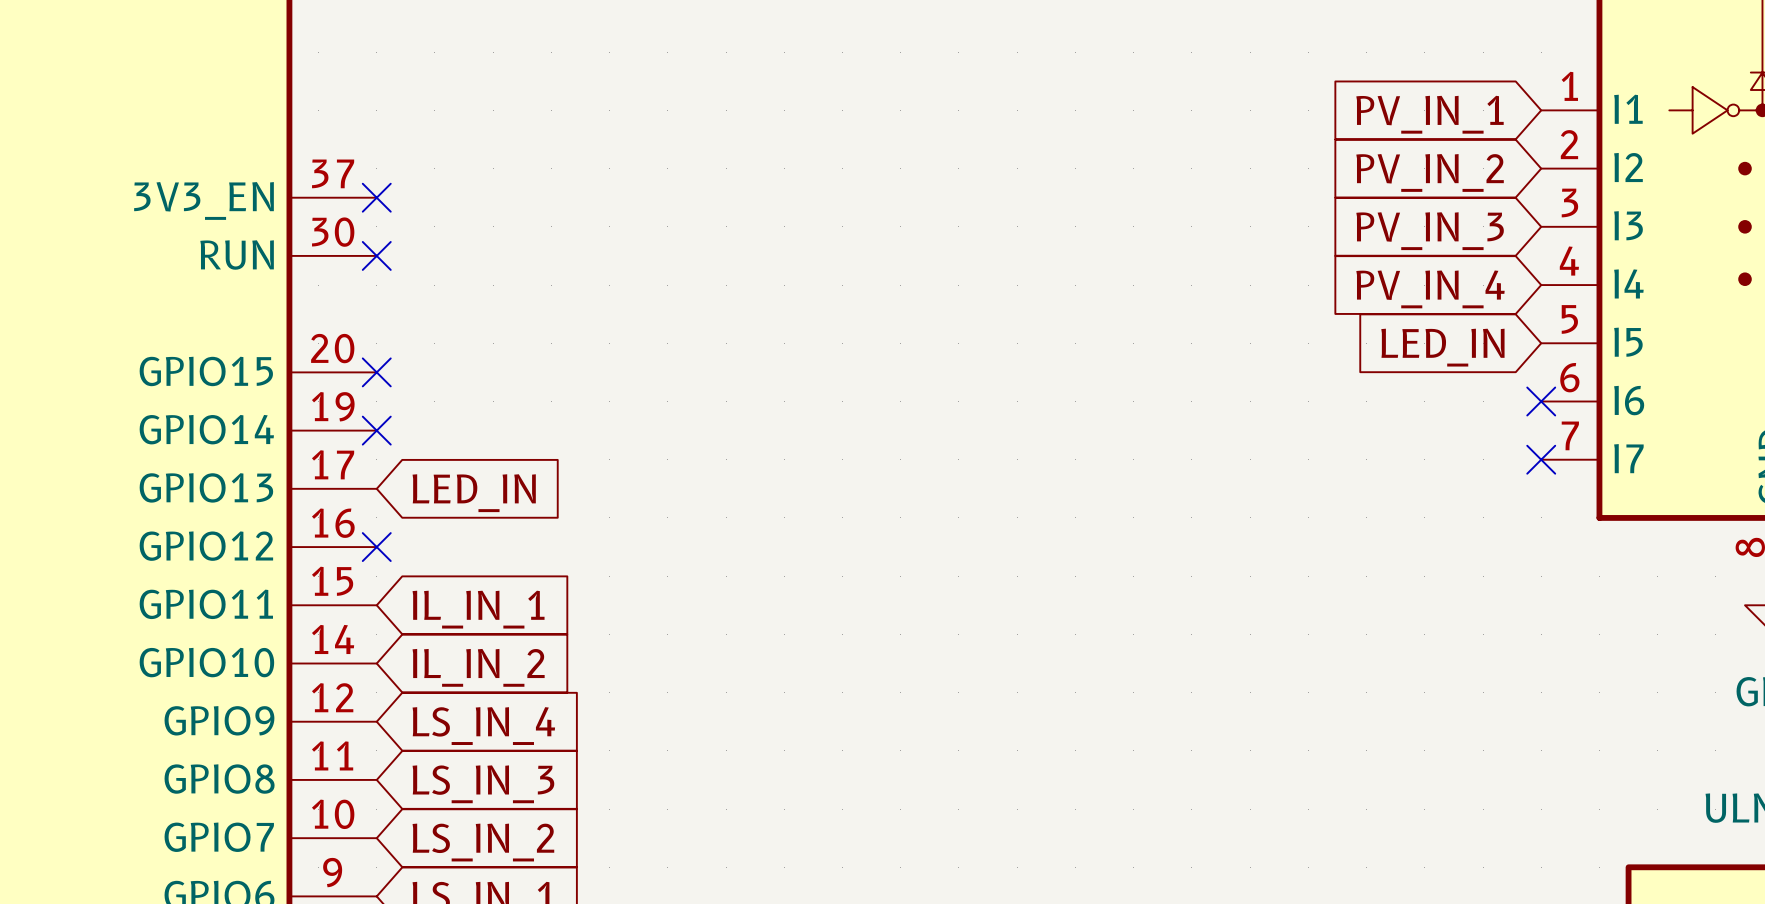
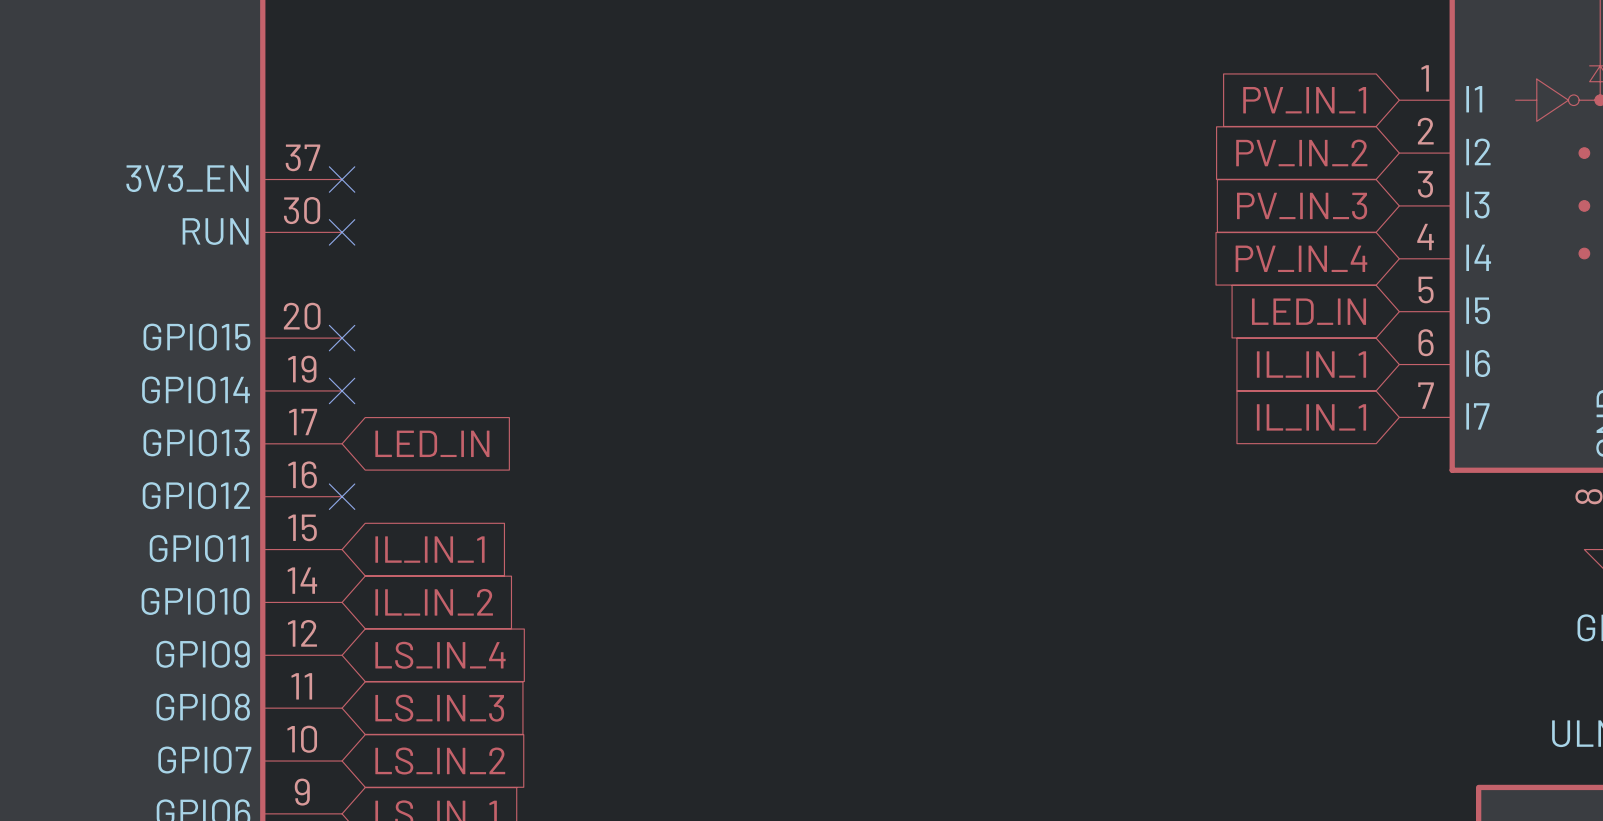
no-connect mark: (1541, 401) -> none
global label: none -> IL_IN_1 (1311, 364)
no-connect mark: (1541, 459) -> none
global label: none -> IL_IN_1 (1311, 417)

